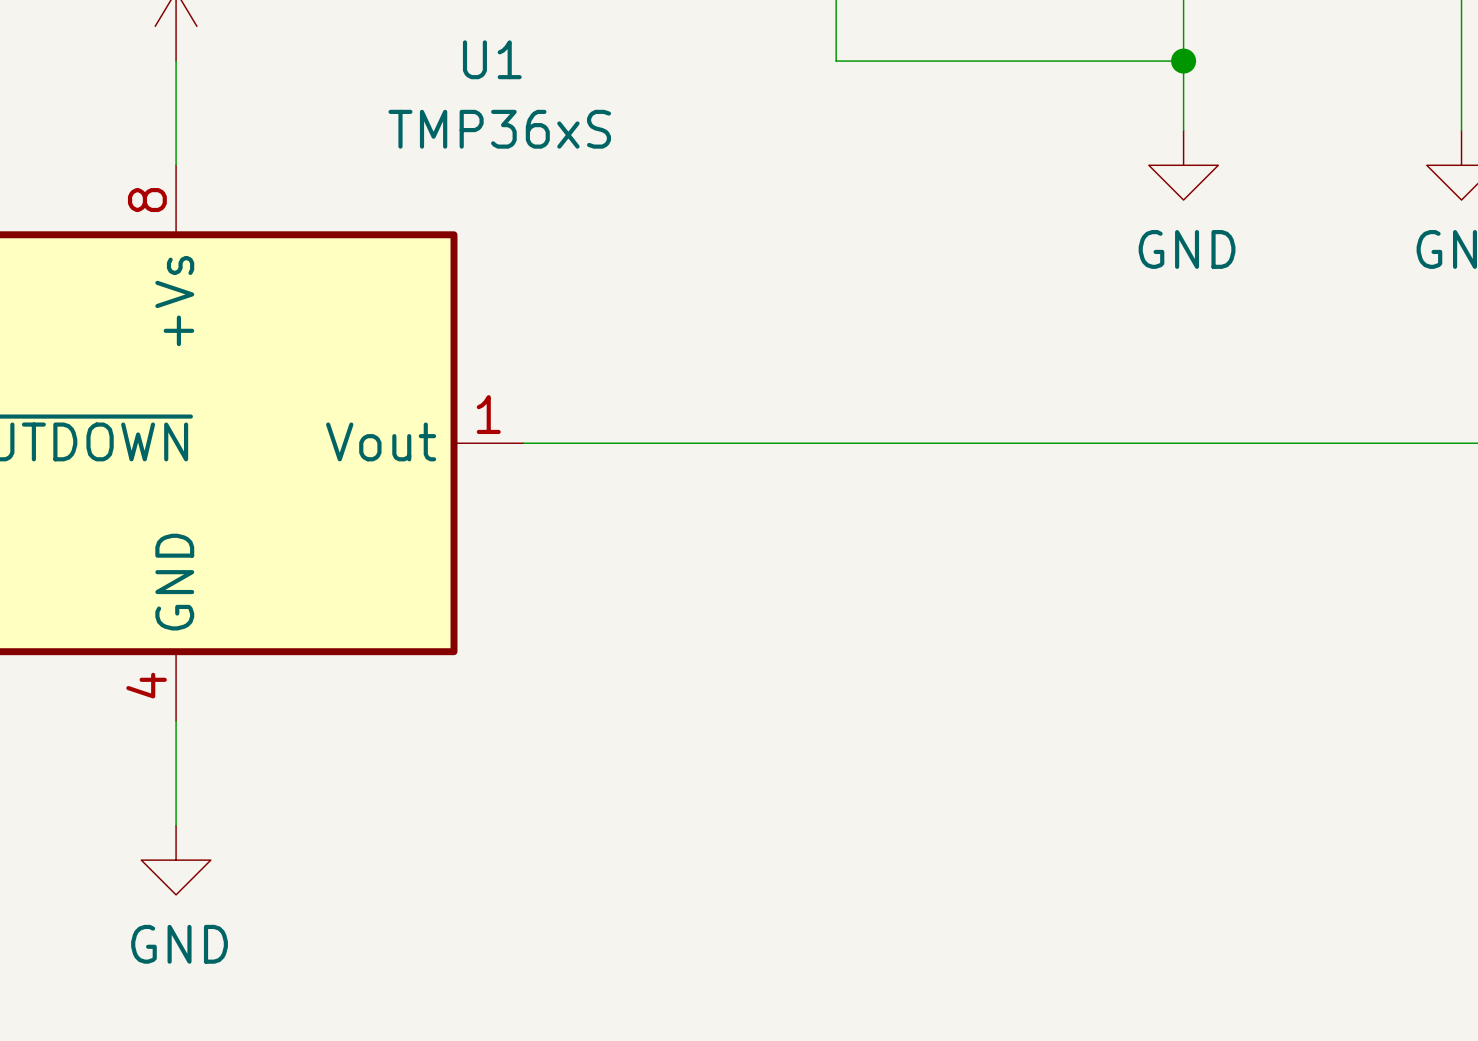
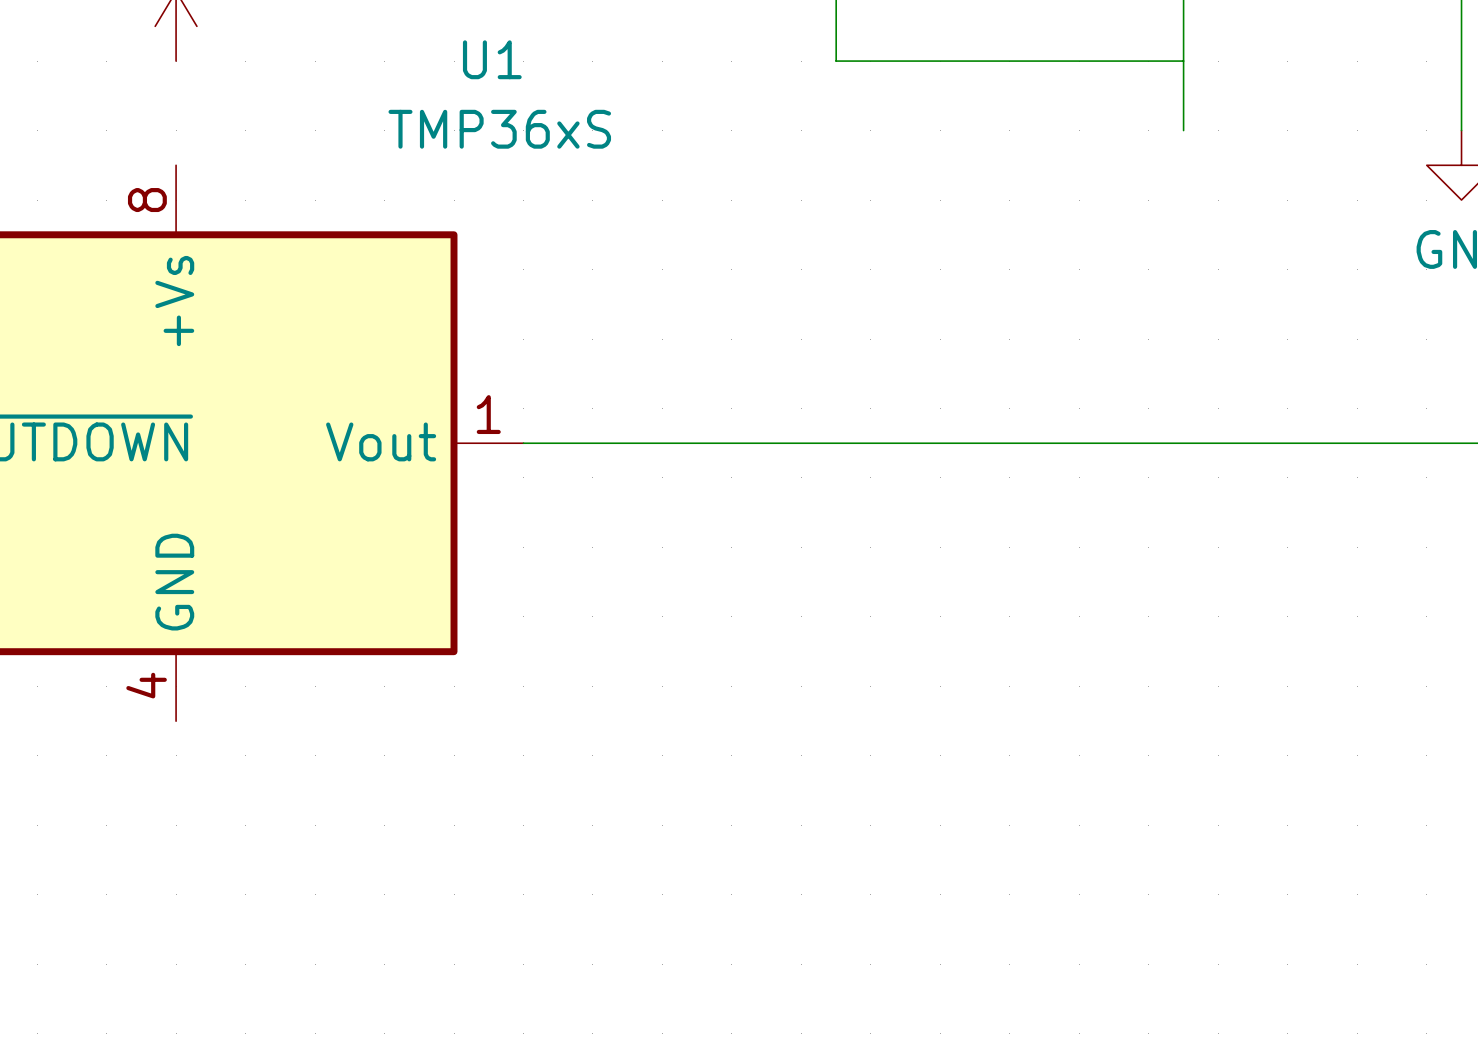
wire: (176, 61) (176, 165) -> none
junction: (1183, 61) -> none
power symbol: GND (1183, 165) -> none
wire: (176, 721) (176, 825) -> none
power symbol: GND (176, 860) -> none

